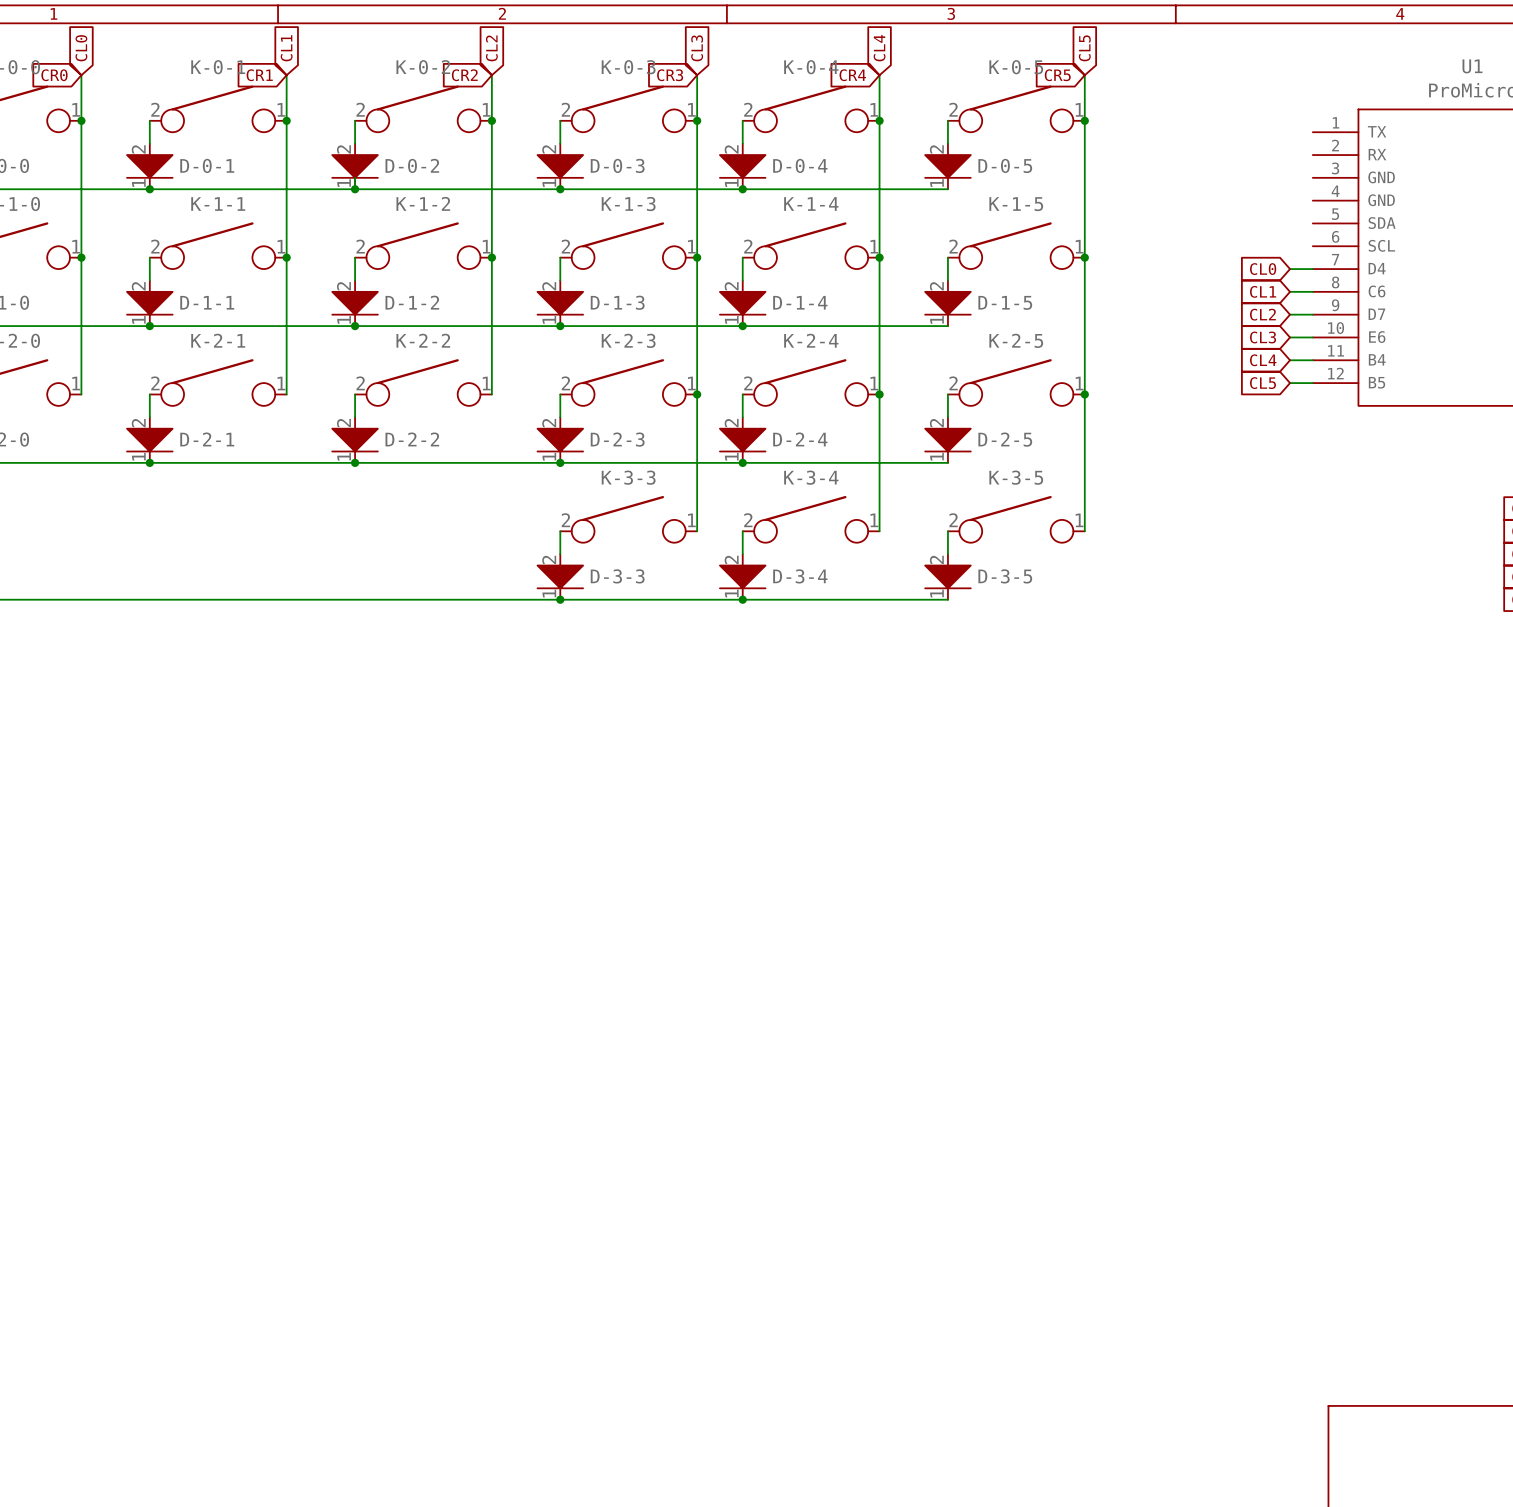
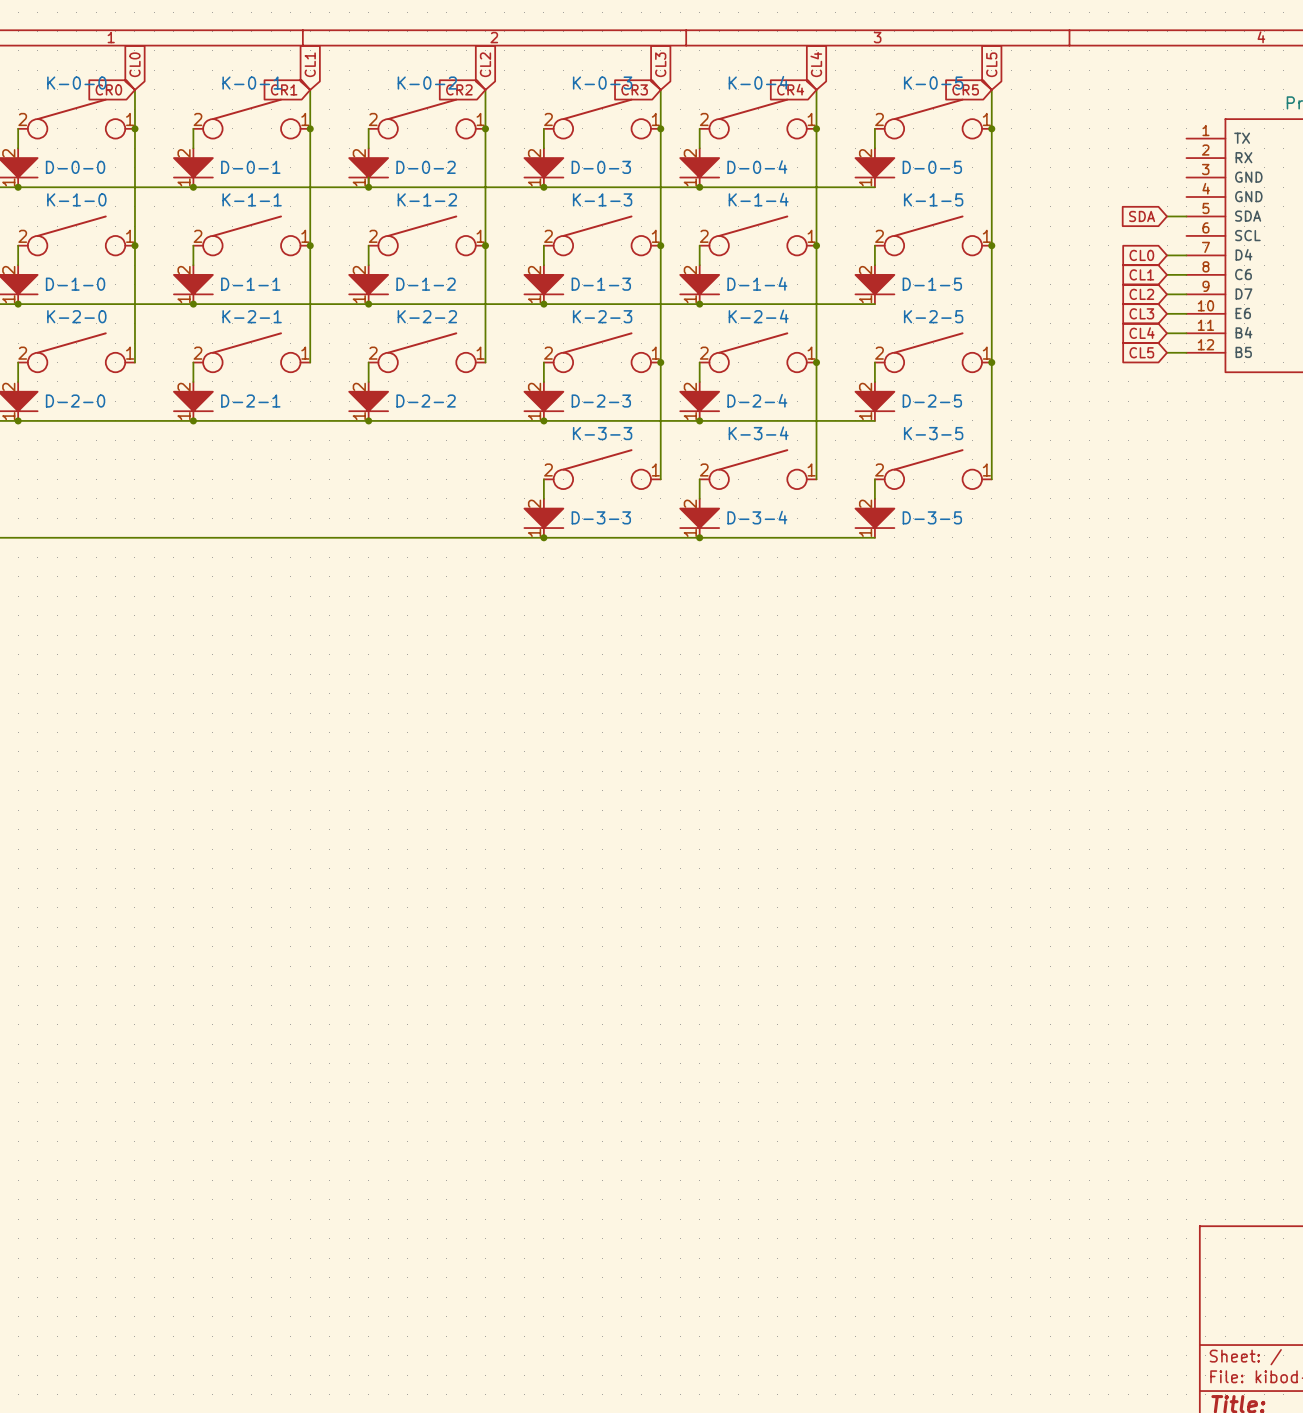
global label: none -> SDA (1142, 216)
wire: none -> (1167, 216) (1186, 216)

